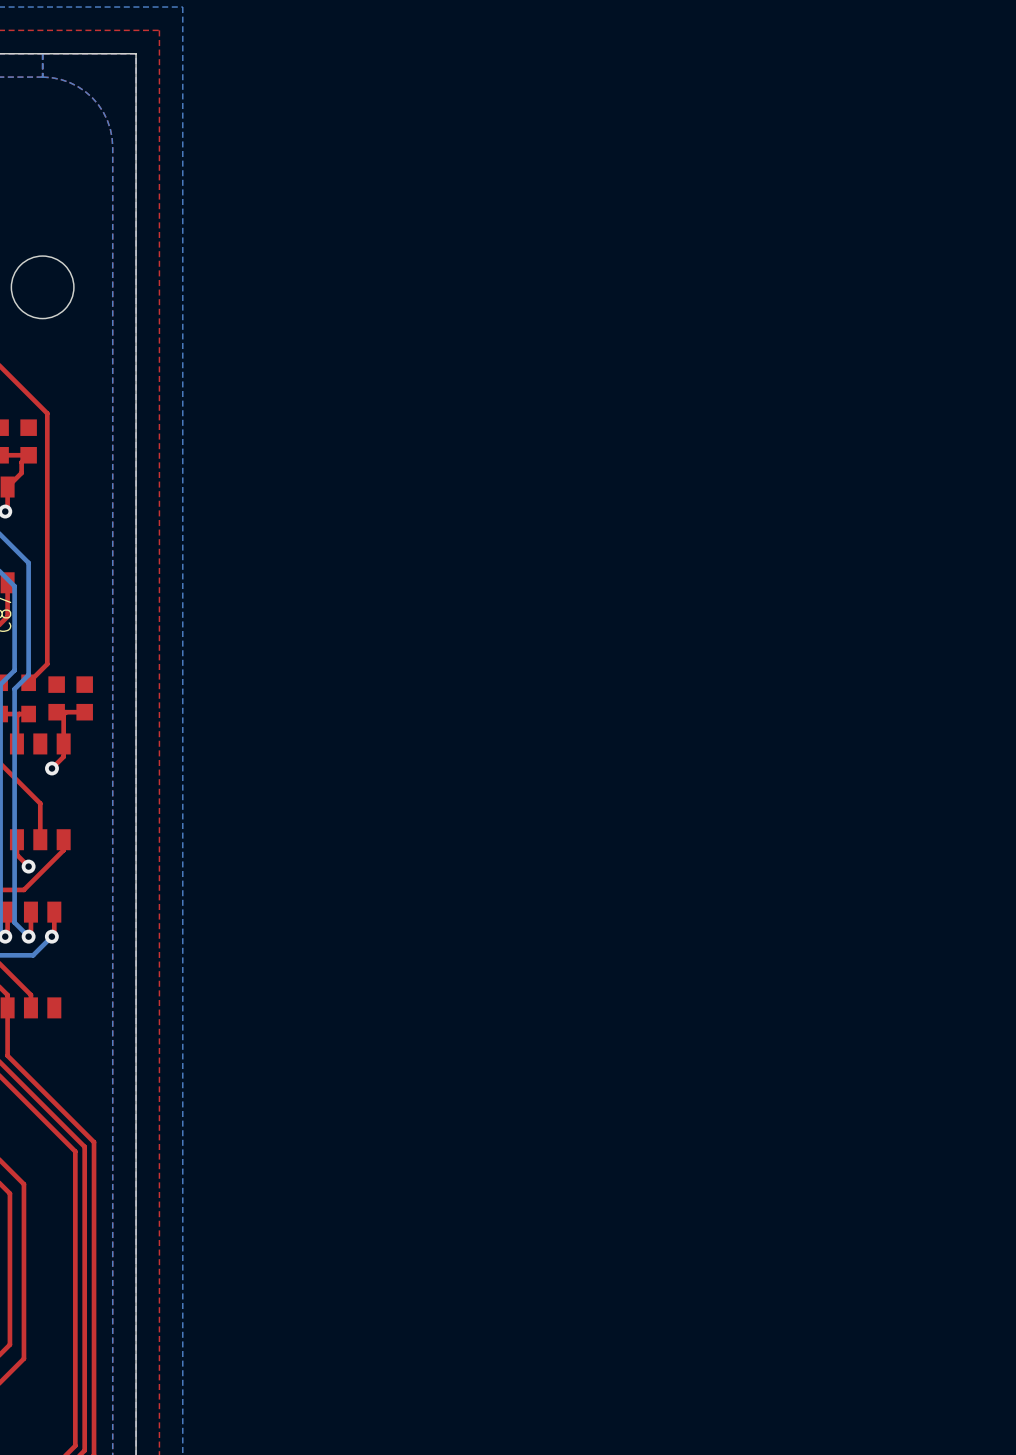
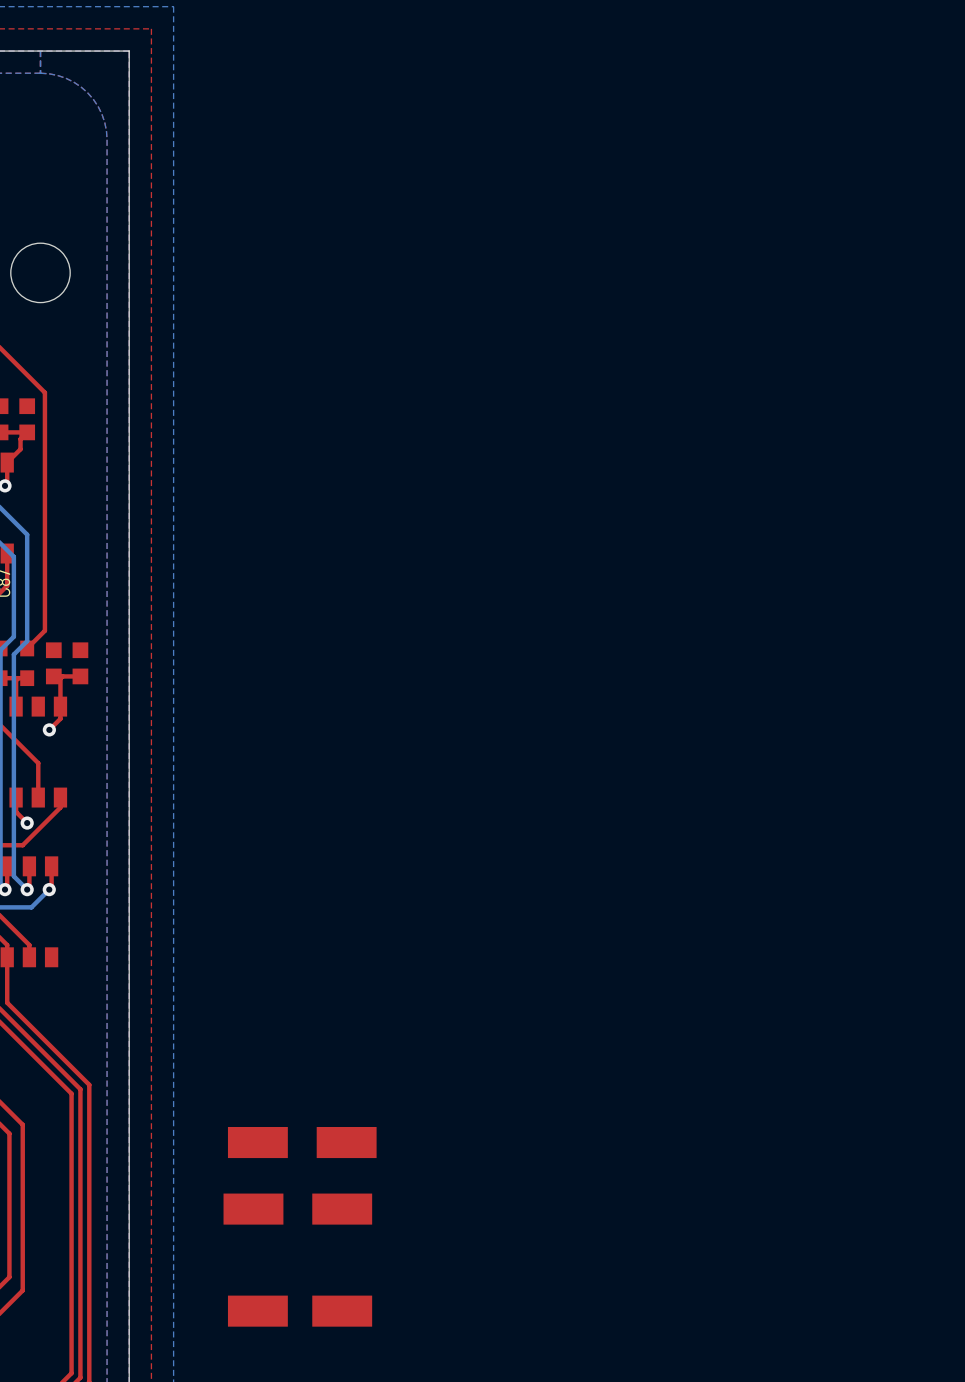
part: none -> (257, 1142)
part: none -> (346, 1142)
part: none -> (253, 1209)
part: none -> (342, 1209)
part: none -> (257, 1311)
part: none -> (342, 1311)

